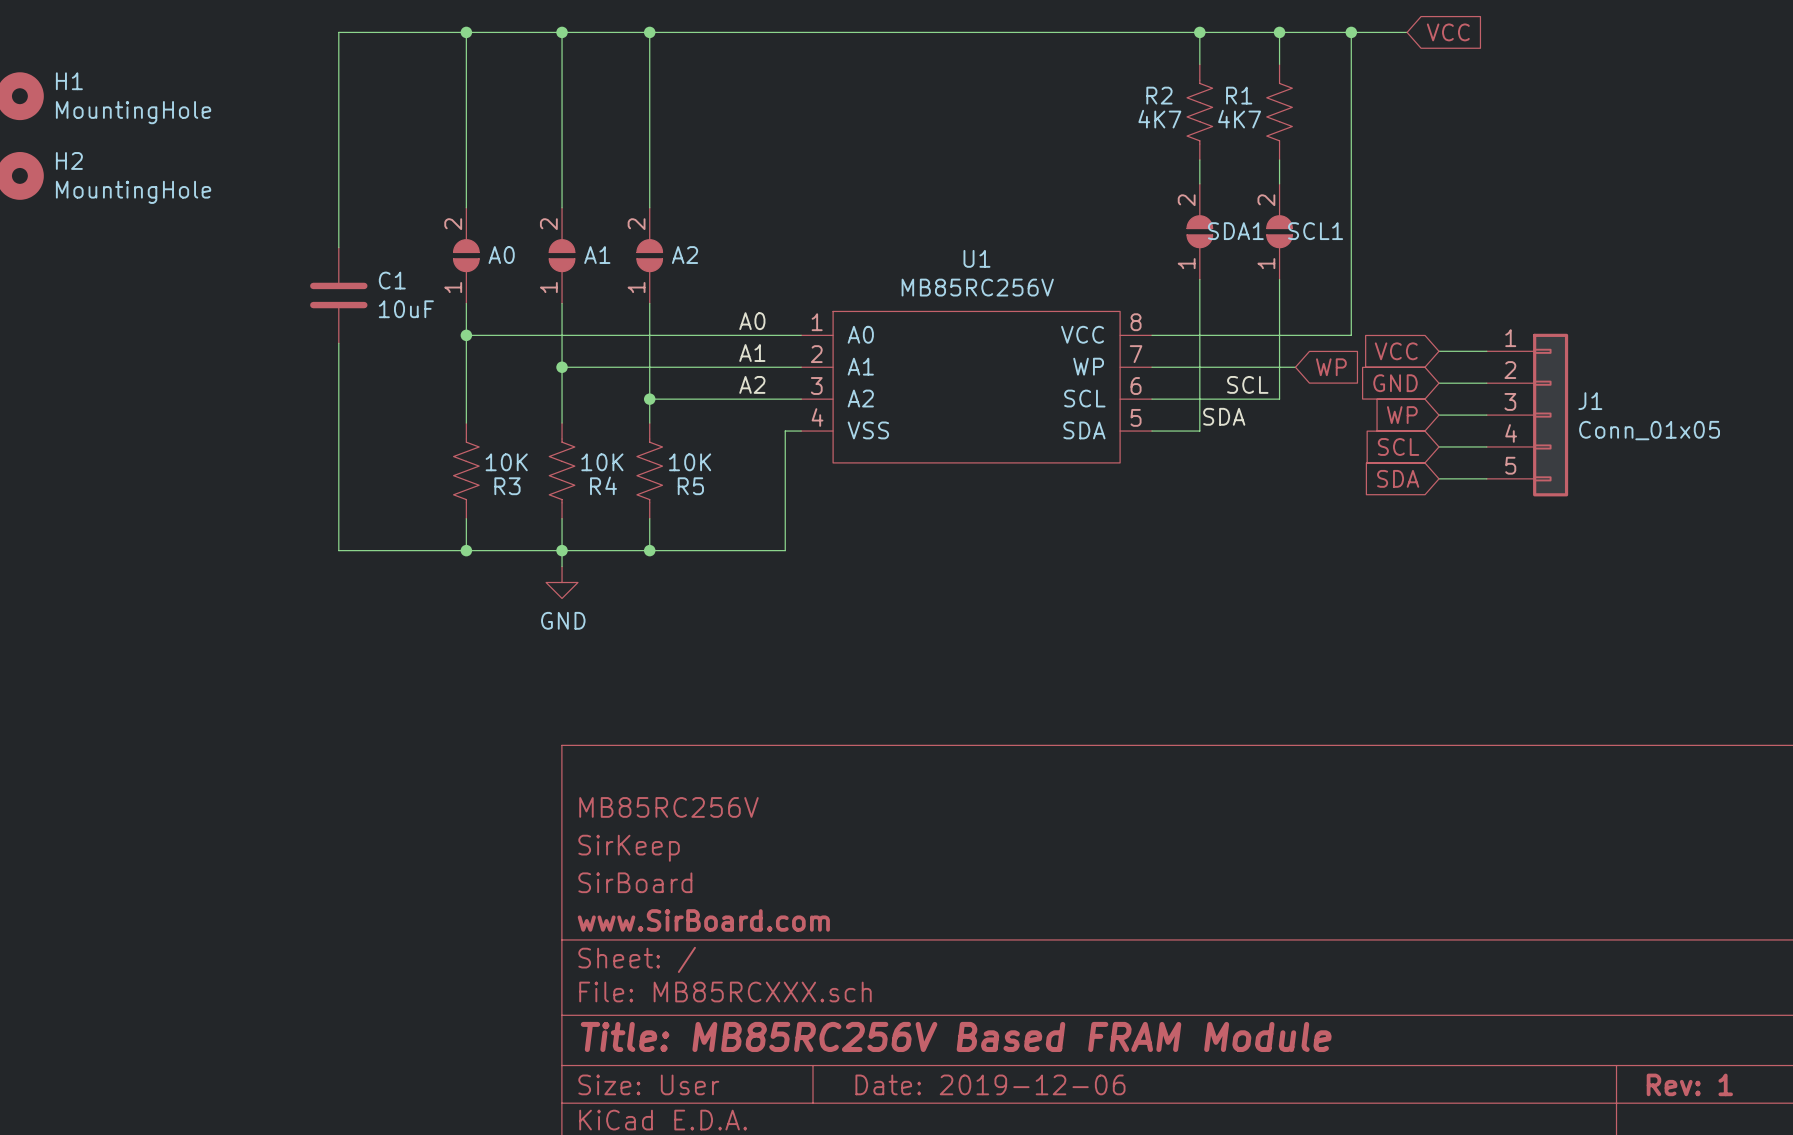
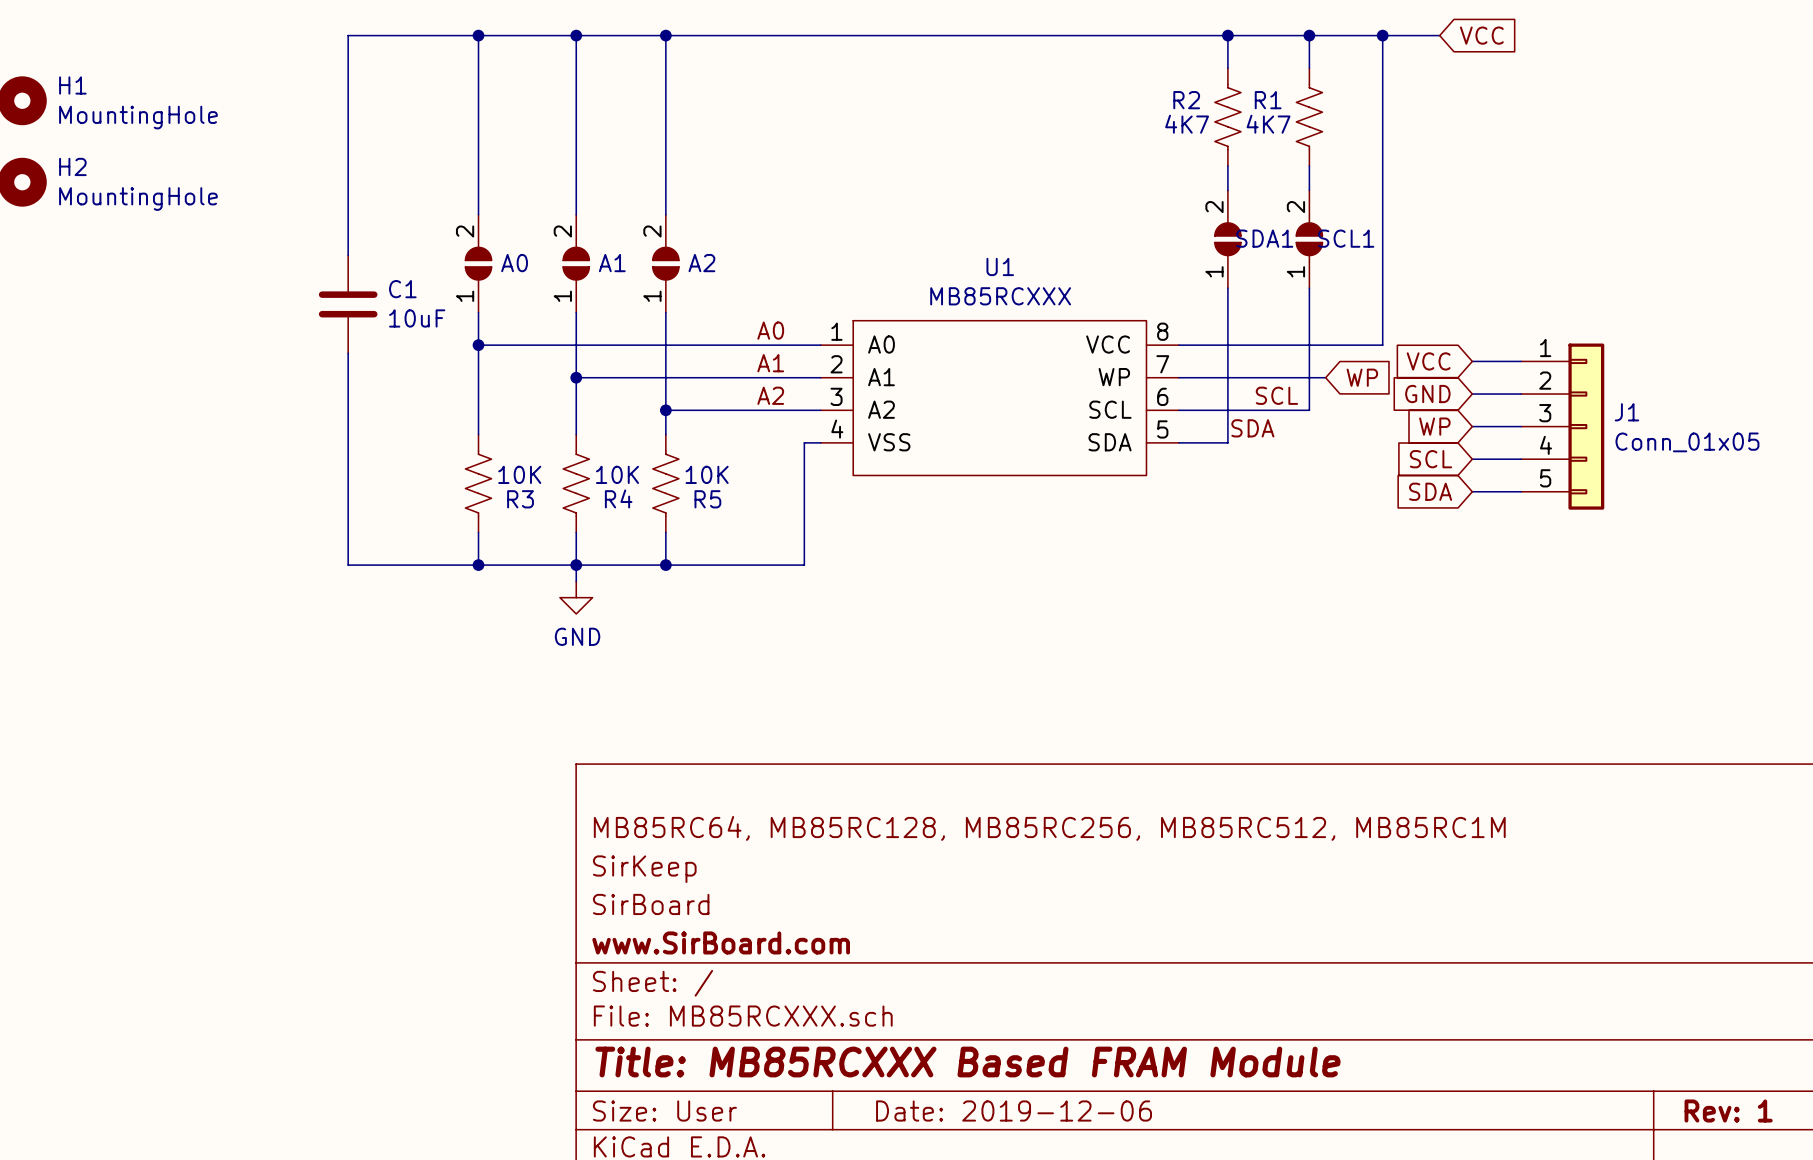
U1 value: MB85RC256V (977, 287) -> MB85RCXXX (1000, 296)
title block: MB85RC256V (668, 807) -> MB85RC64, MB85RC128, MB85RC256, MB85RC512, MB85RC1M (1049, 828)
title block: Title: MB85RC256V Based FRAM Module (956, 1036) -> Title: MB85RCXXX Based FRAM Module (968, 1062)

